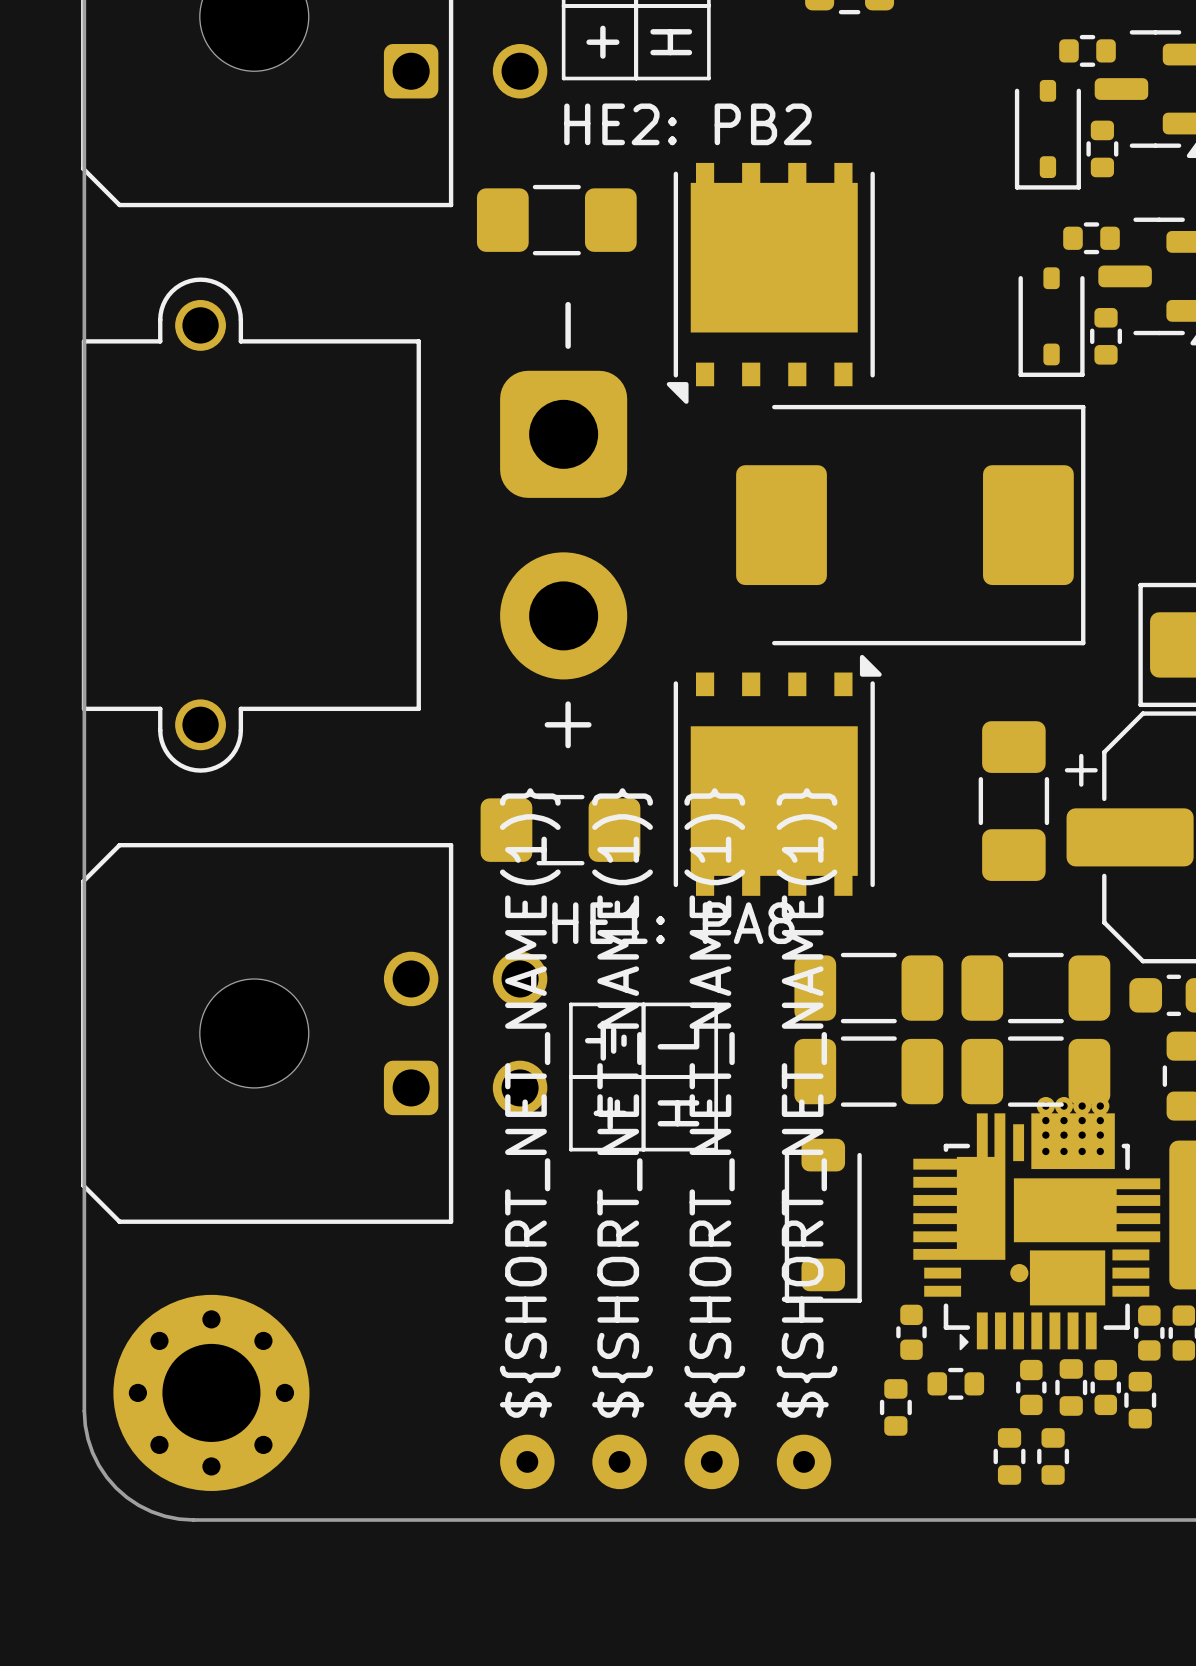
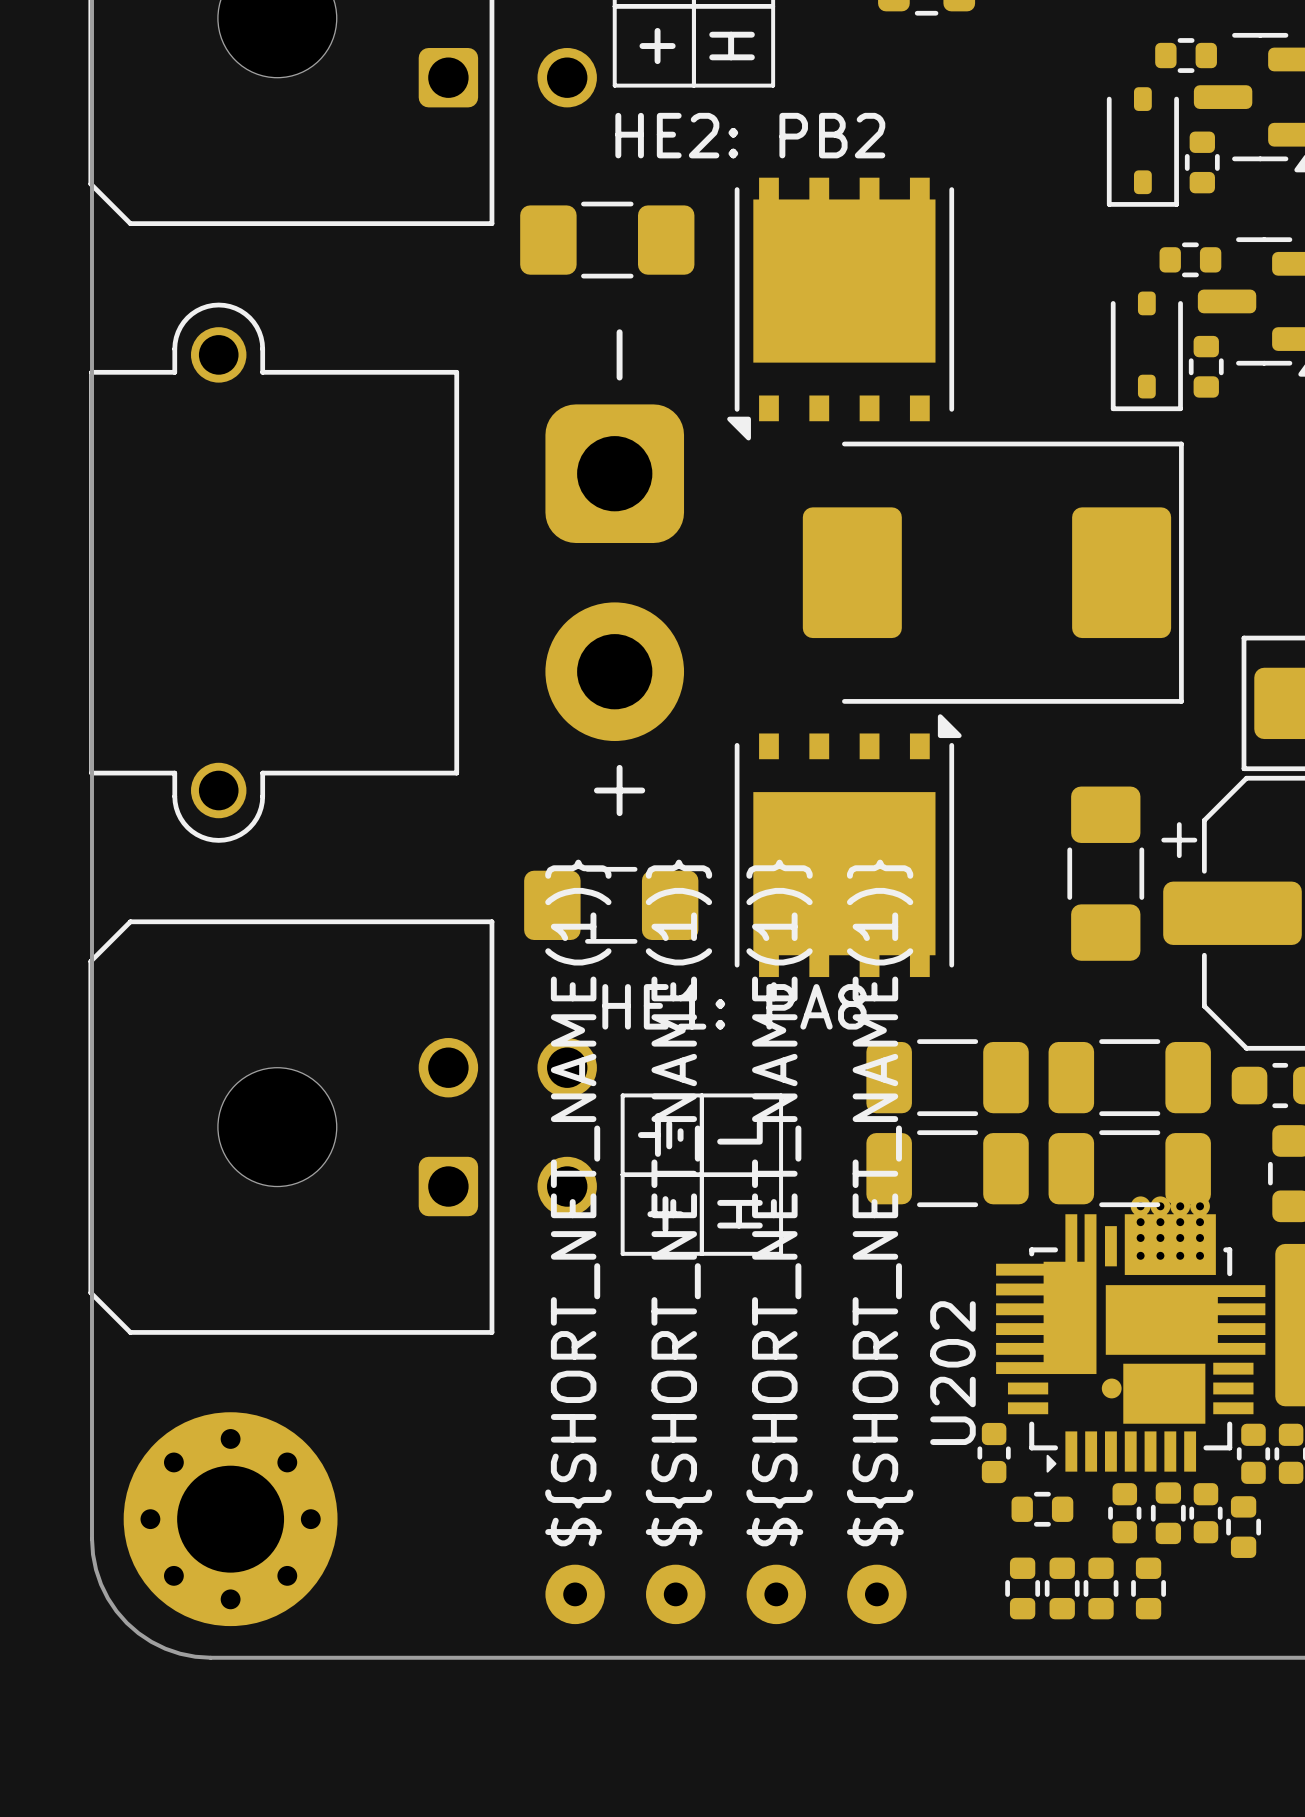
part: (823, 1220) -> none
U202 name: none -> U202 (952, 1373)
part: (895, 1407) -> none
part: none -> (1022, 1588)
part: none -> (1062, 1588)

